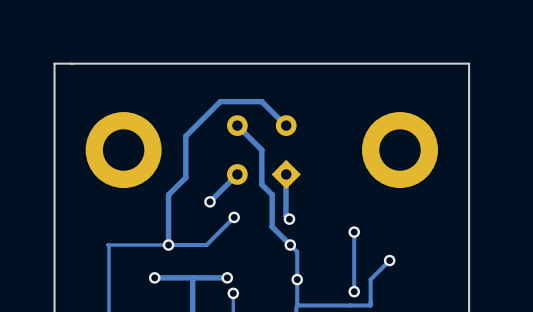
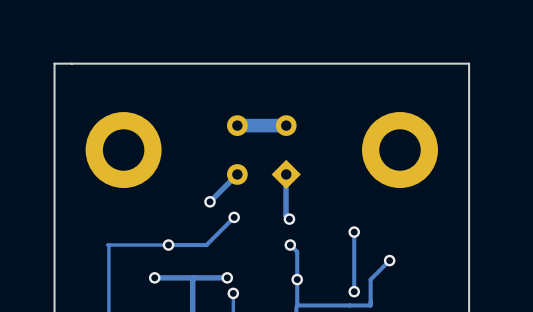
track: (237, 125) (261, 150) (261, 184) (272, 194) (272, 226) (290, 245) -> (237, 125) (286, 125)
track: (286, 125) (261, 101) (220, 101) (185, 136) (185, 177) (168, 194) (168, 245) -> none

